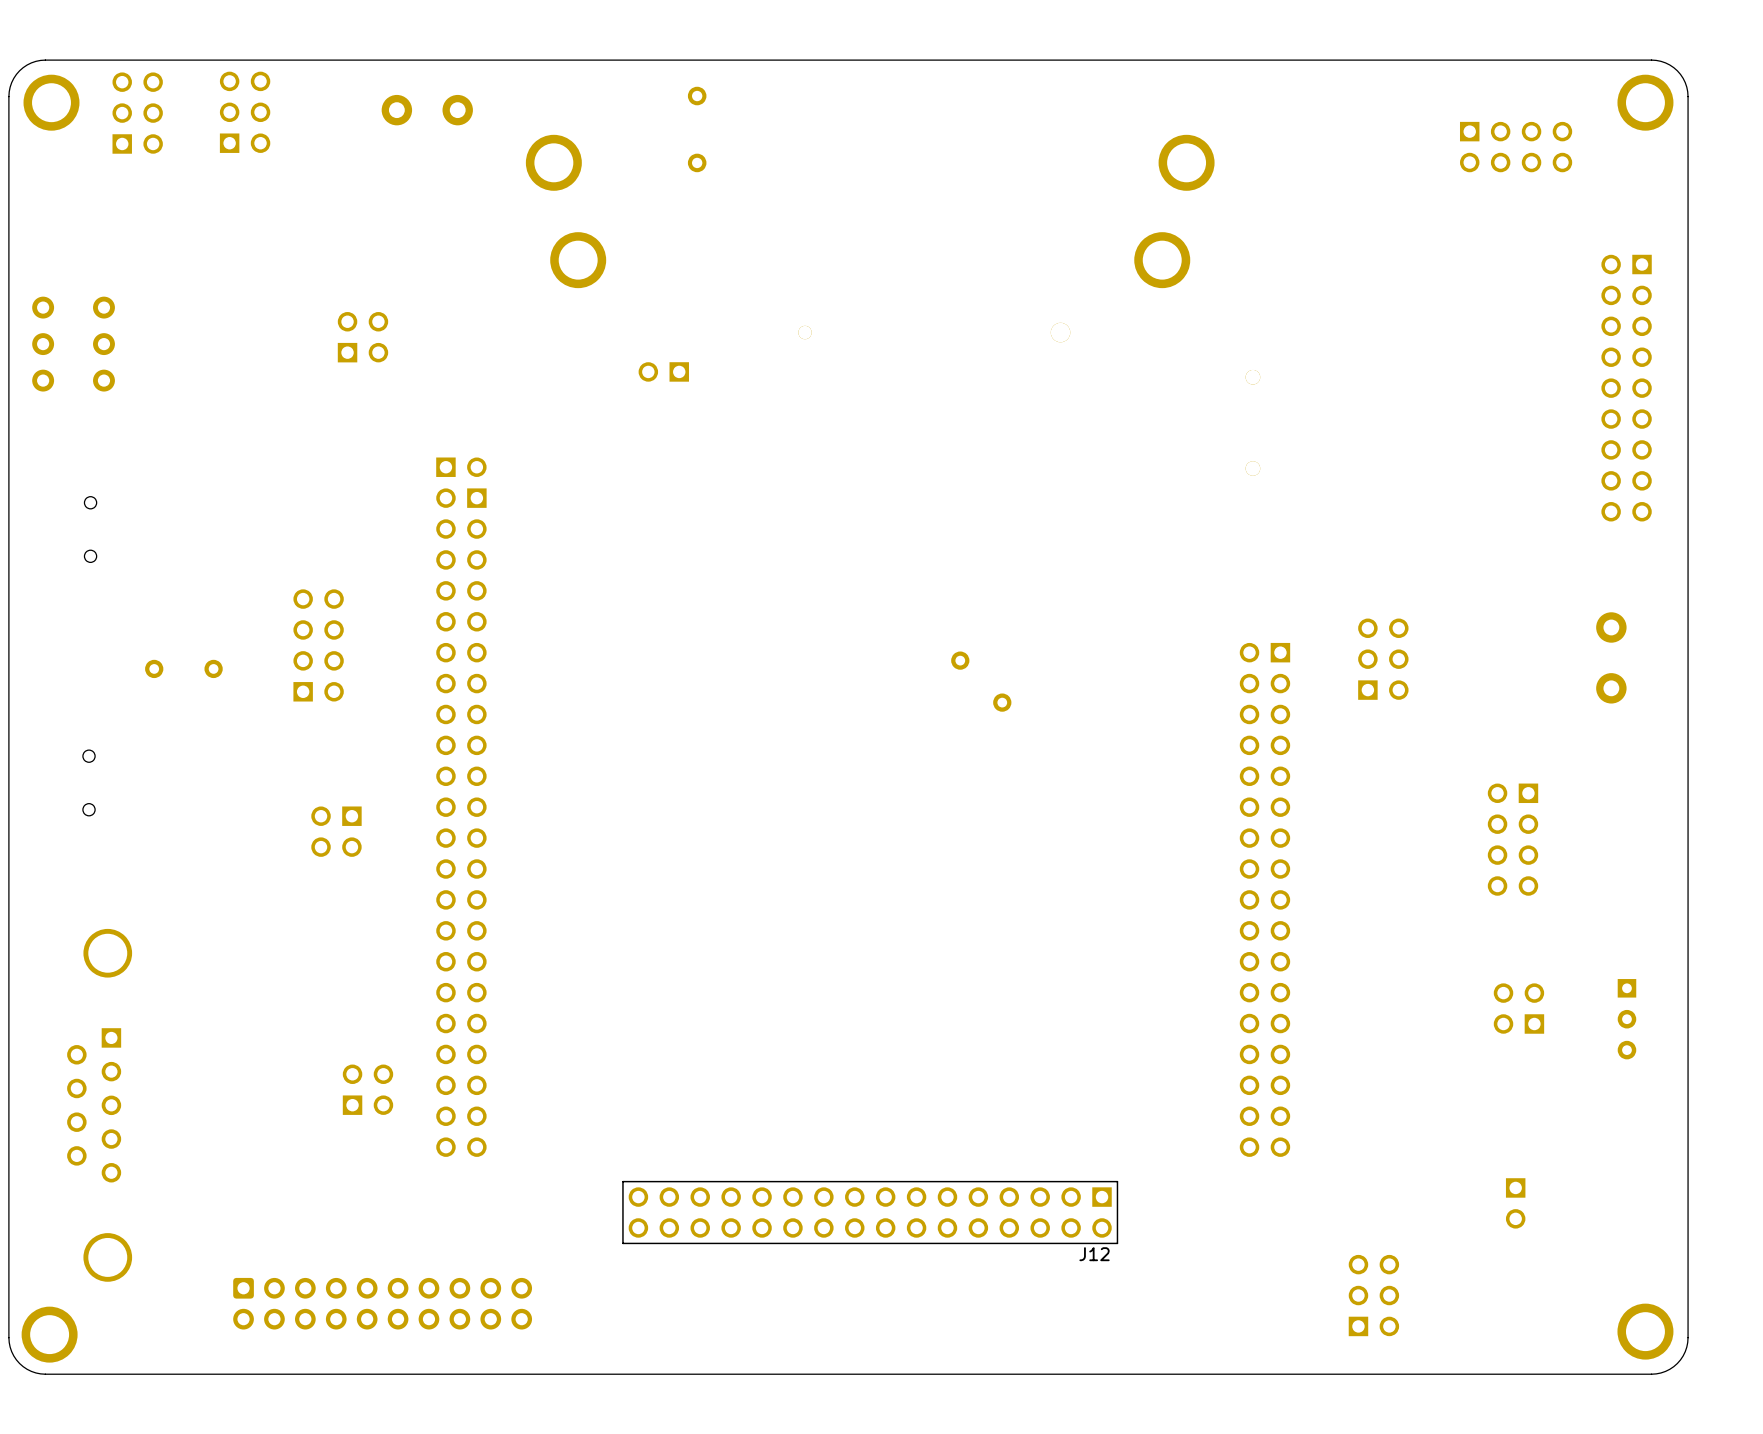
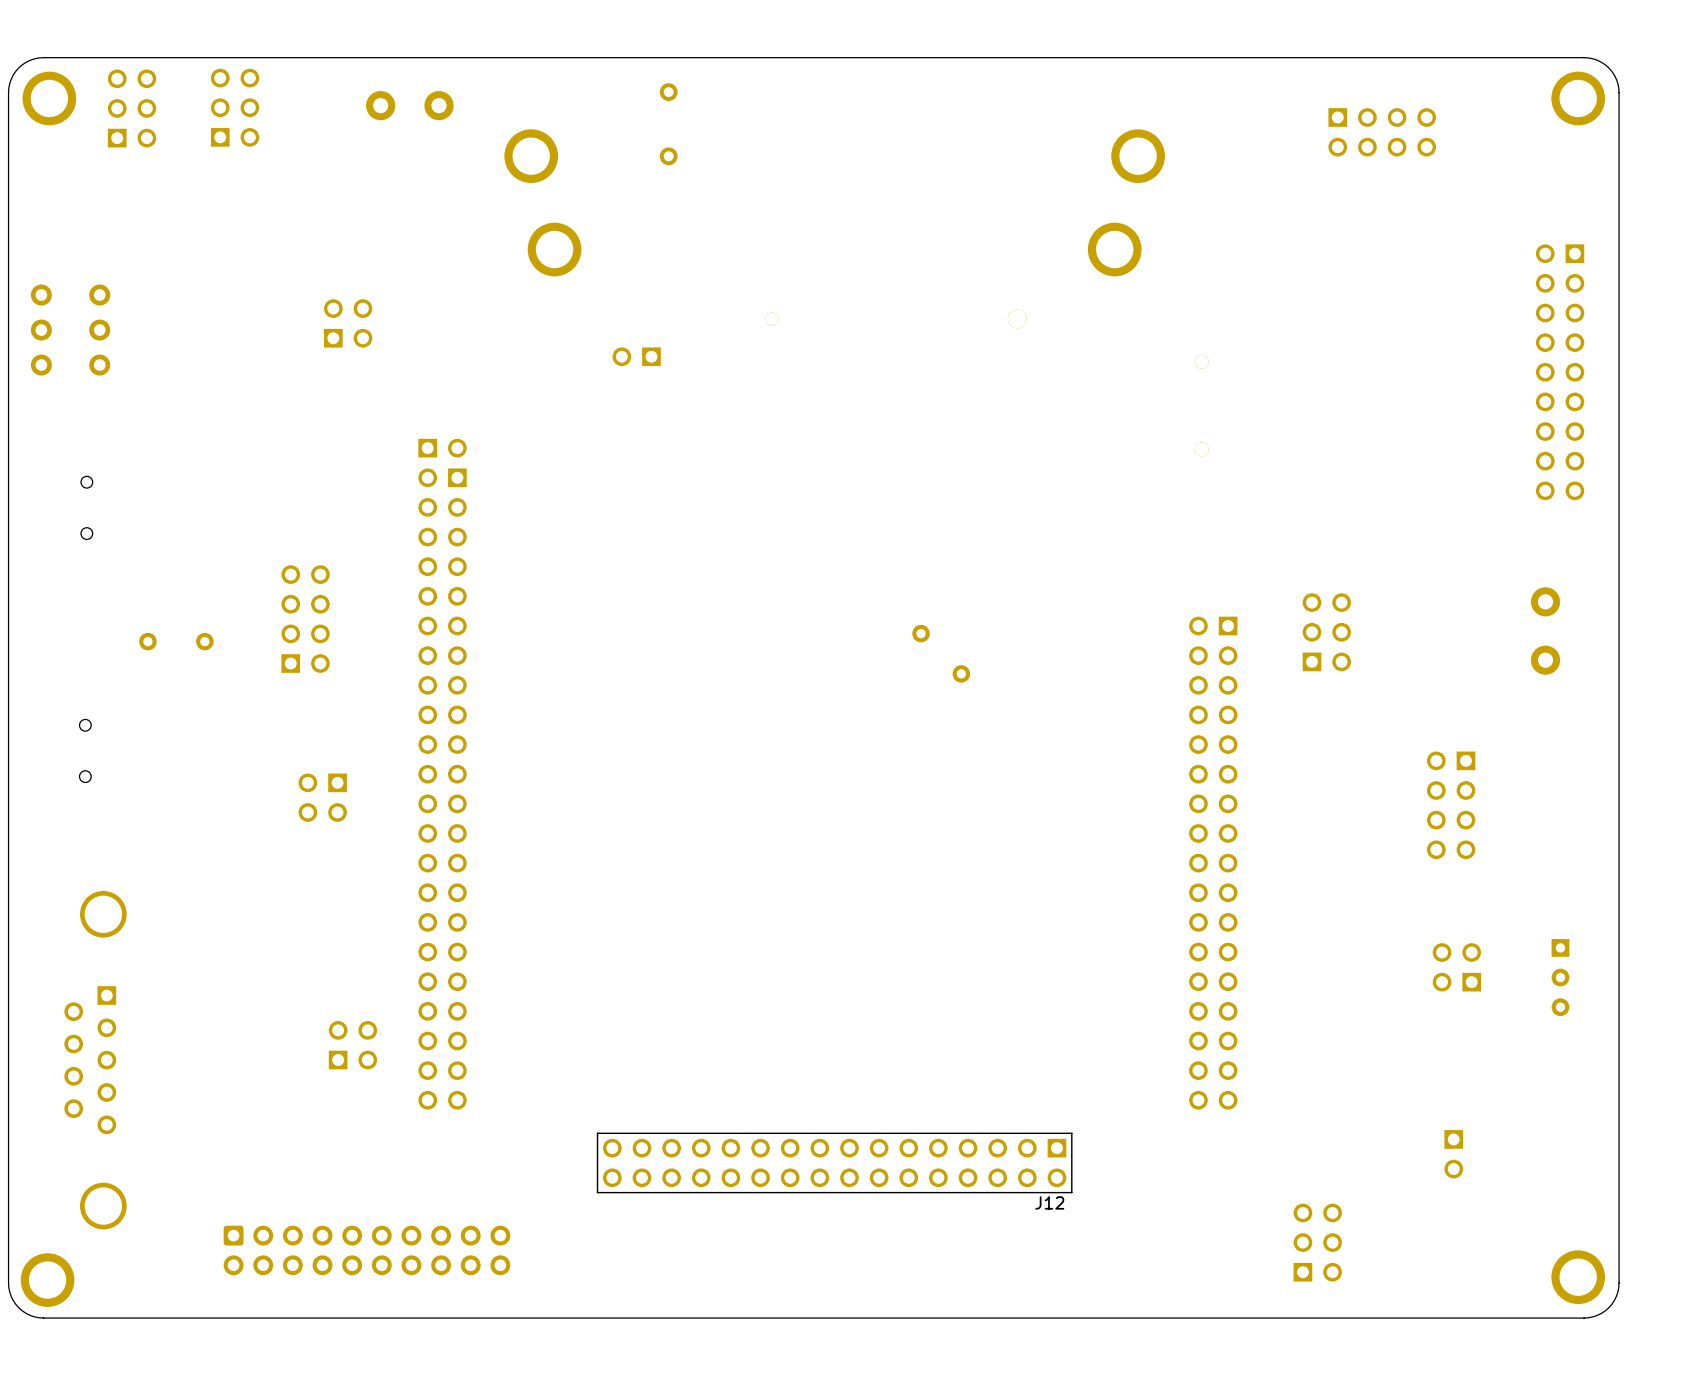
part position: (1516, 147) -> (1382, 132)

